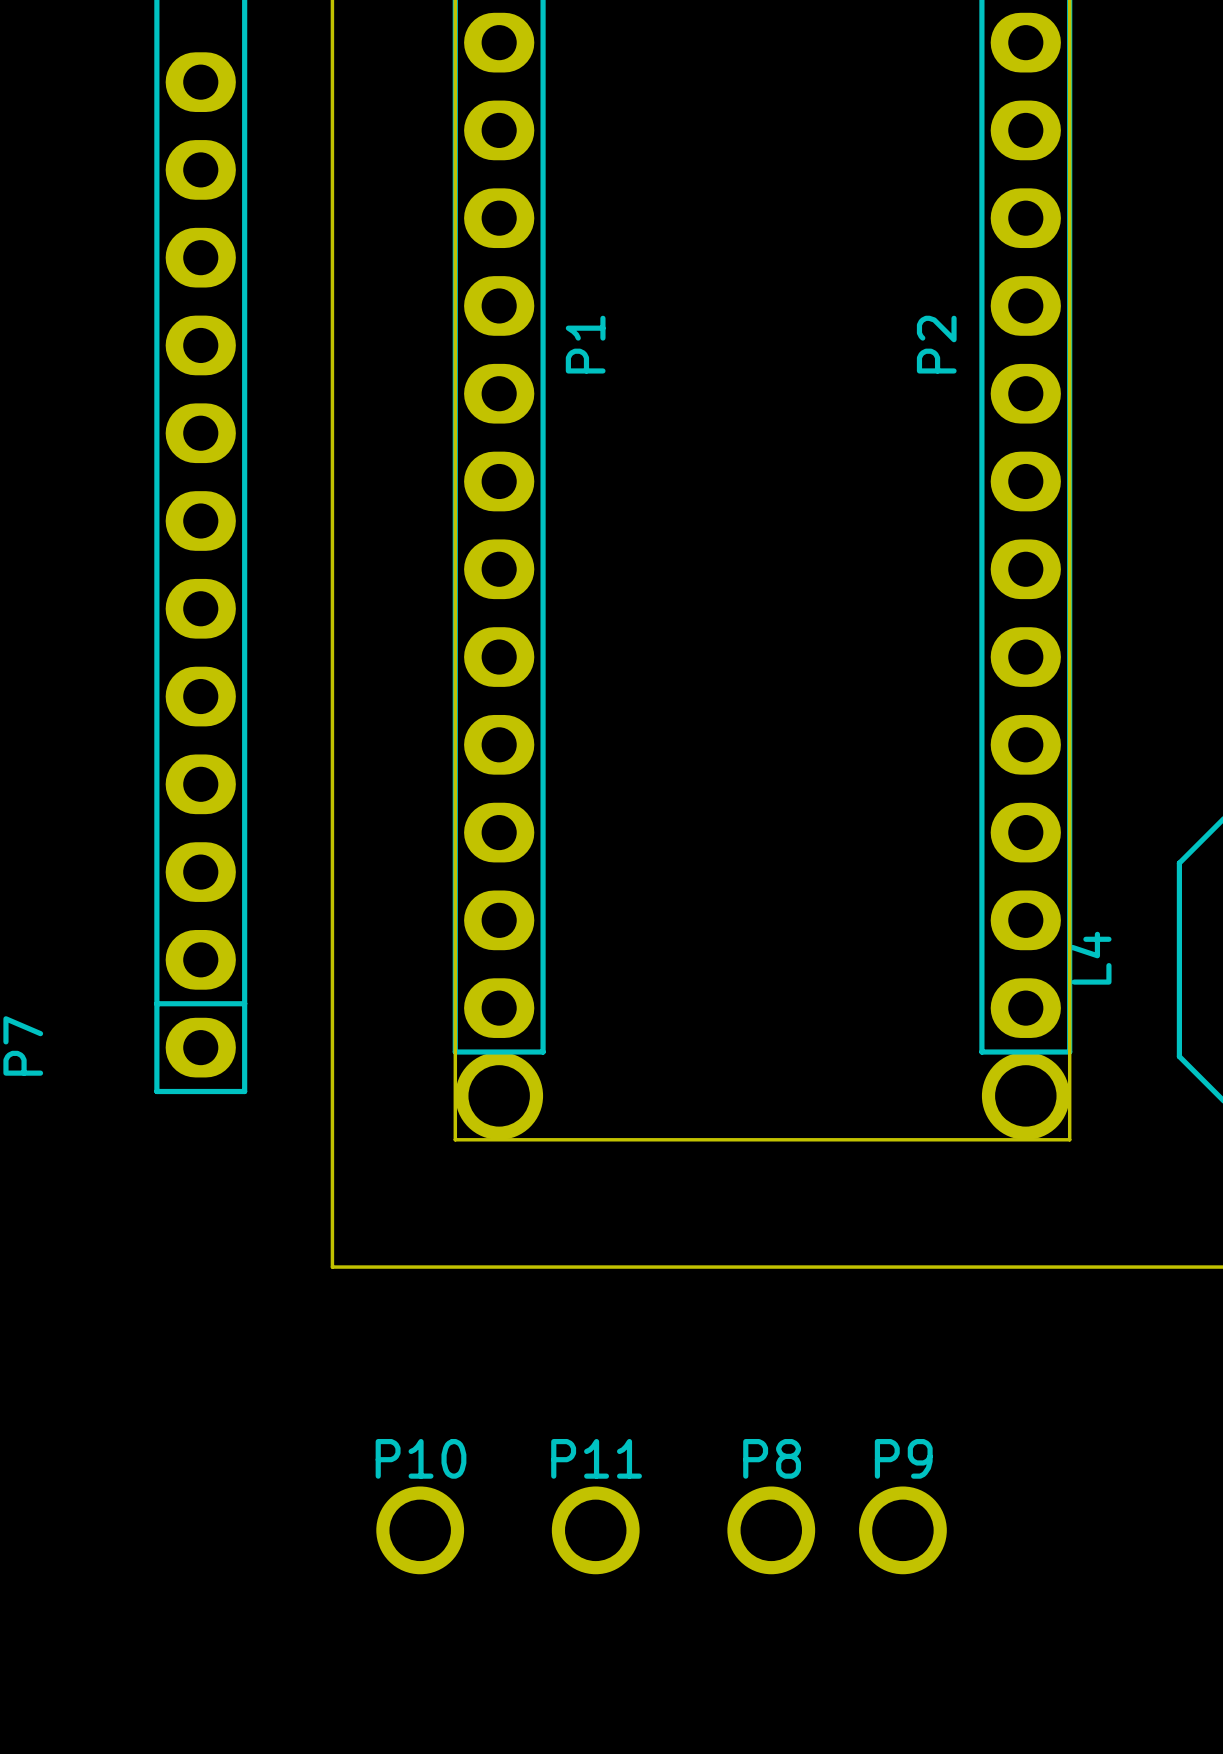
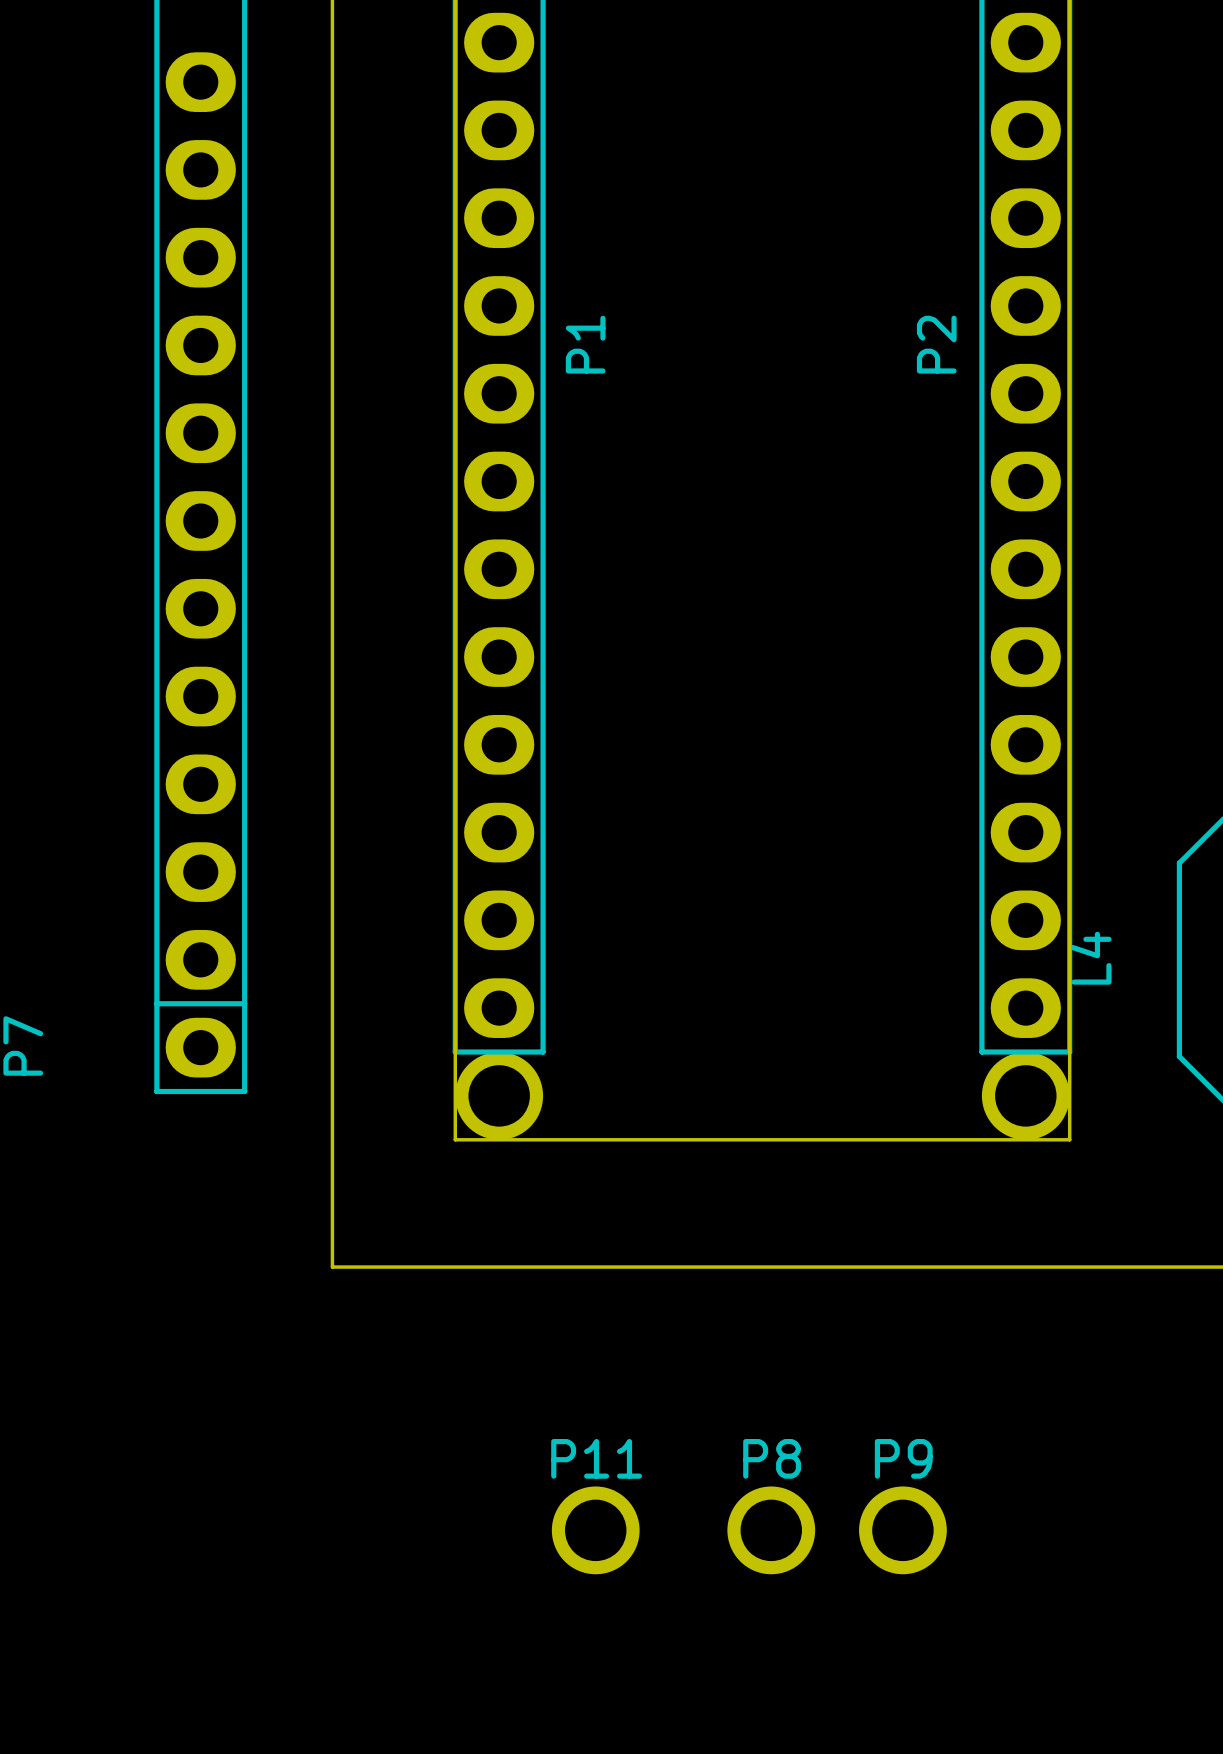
P10: (420, 1530) -> none

